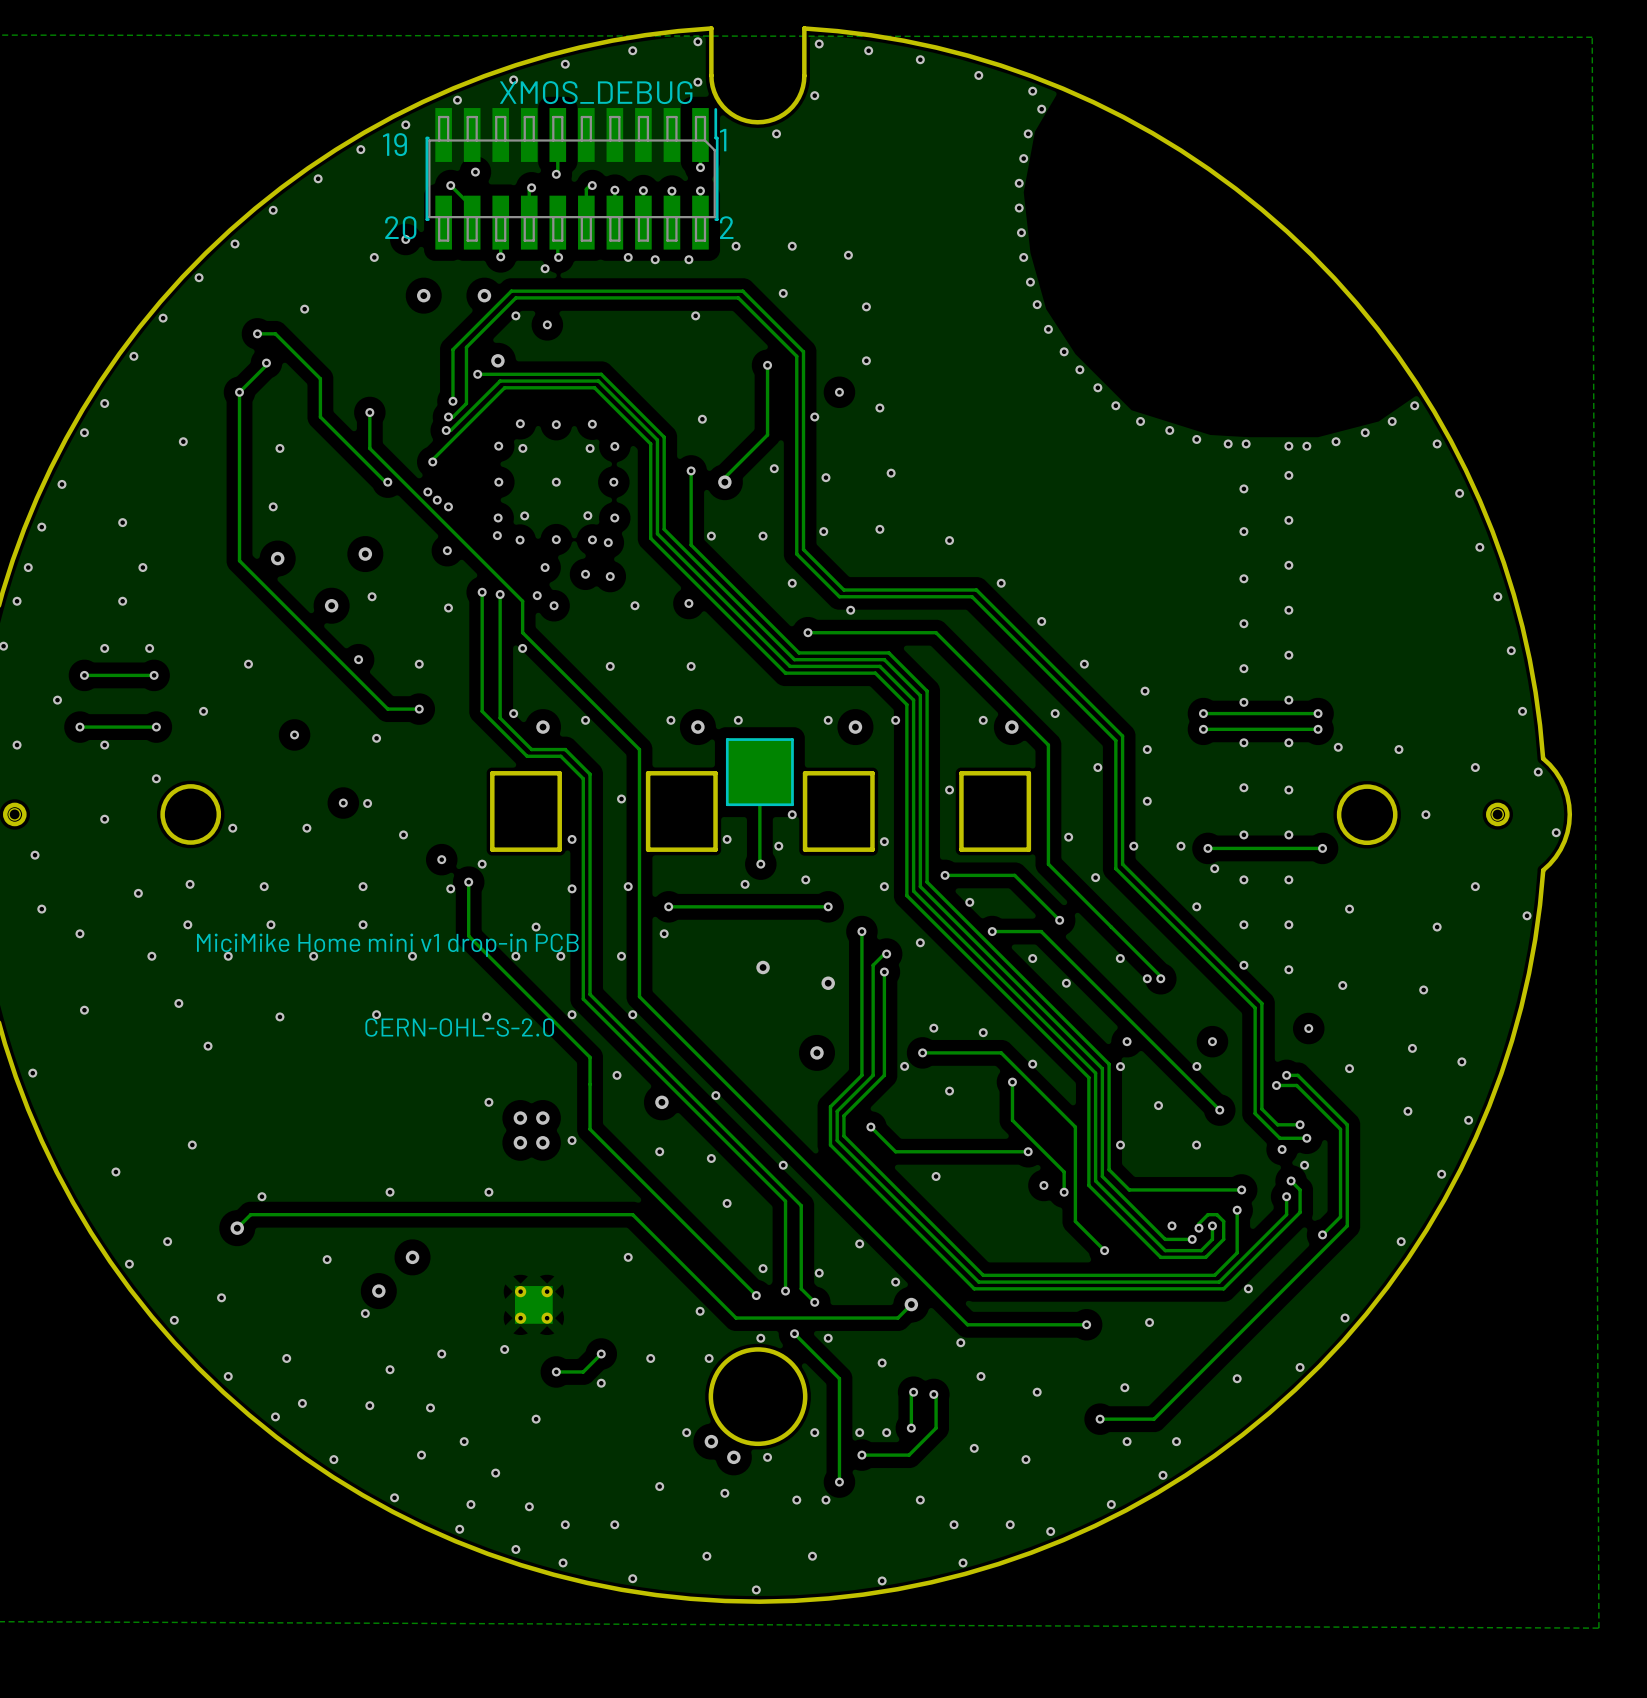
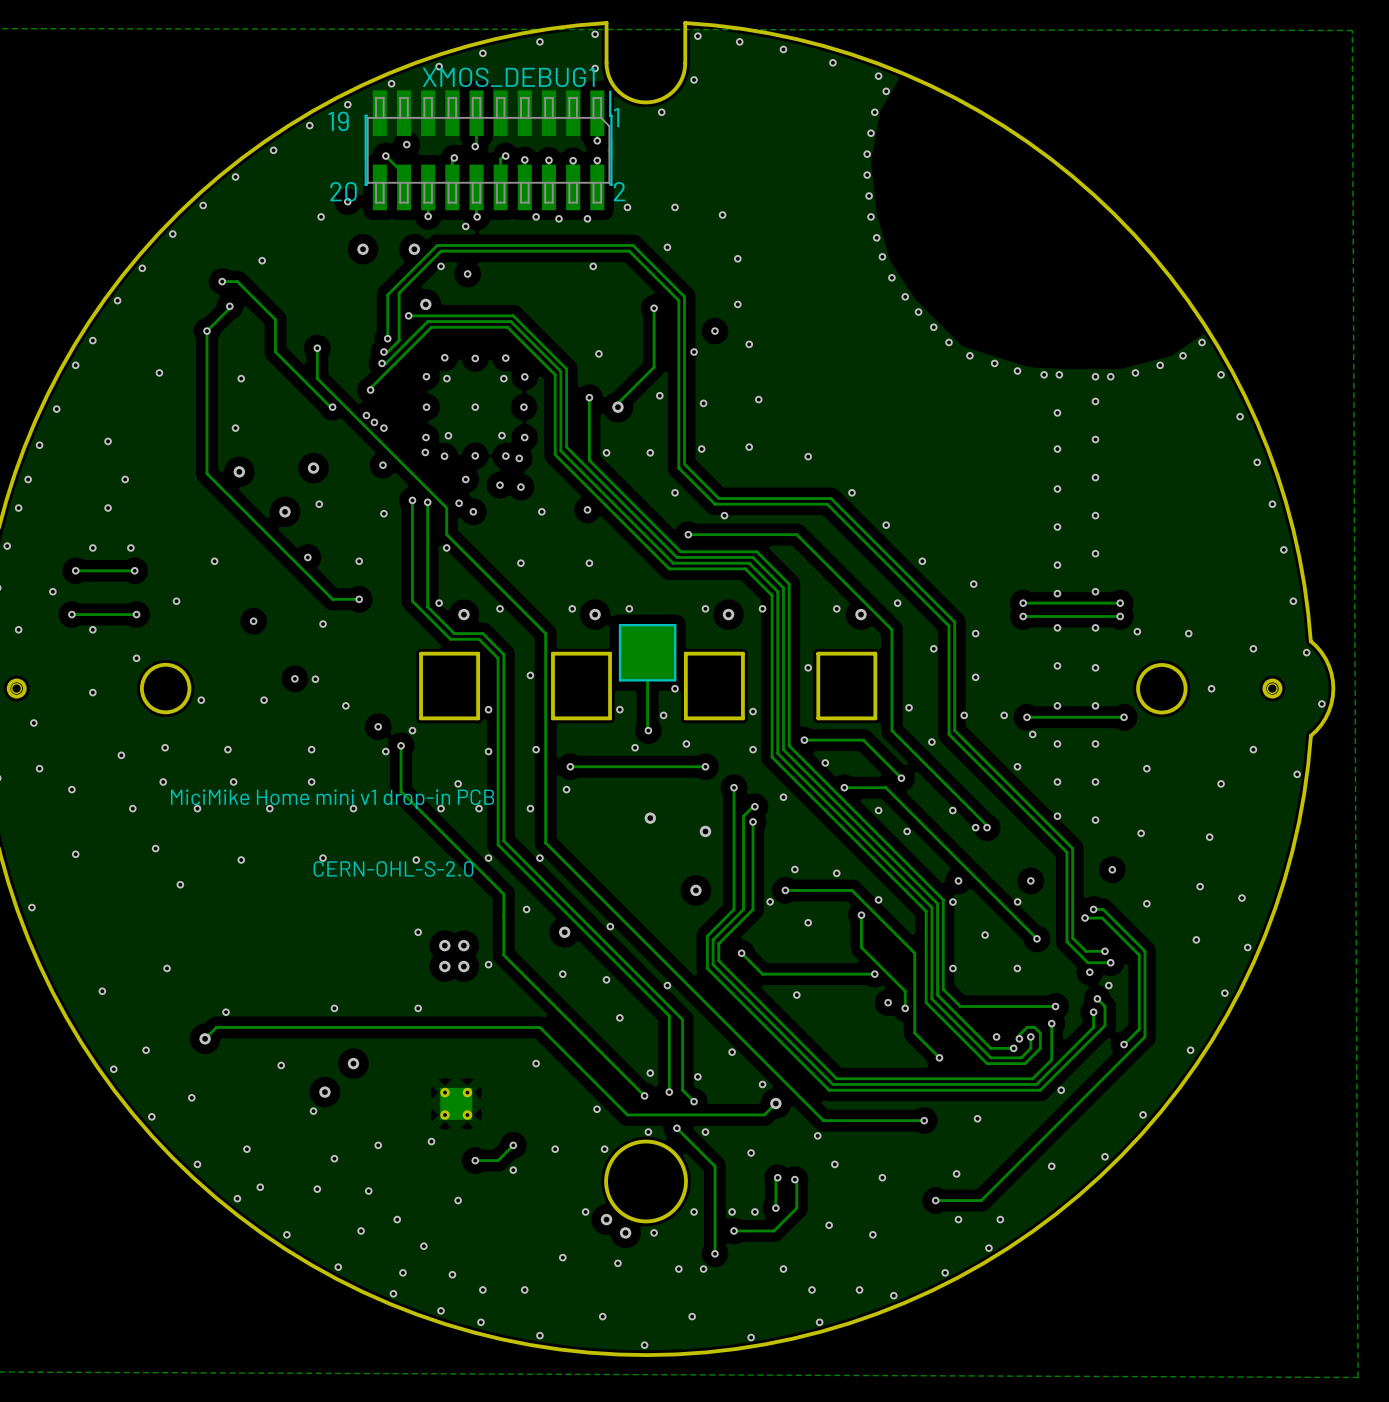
XMOS_DEBUG name: XMOS_DEBUG (596, 92) -> XMOS_DEBUG1 (508, 77)

